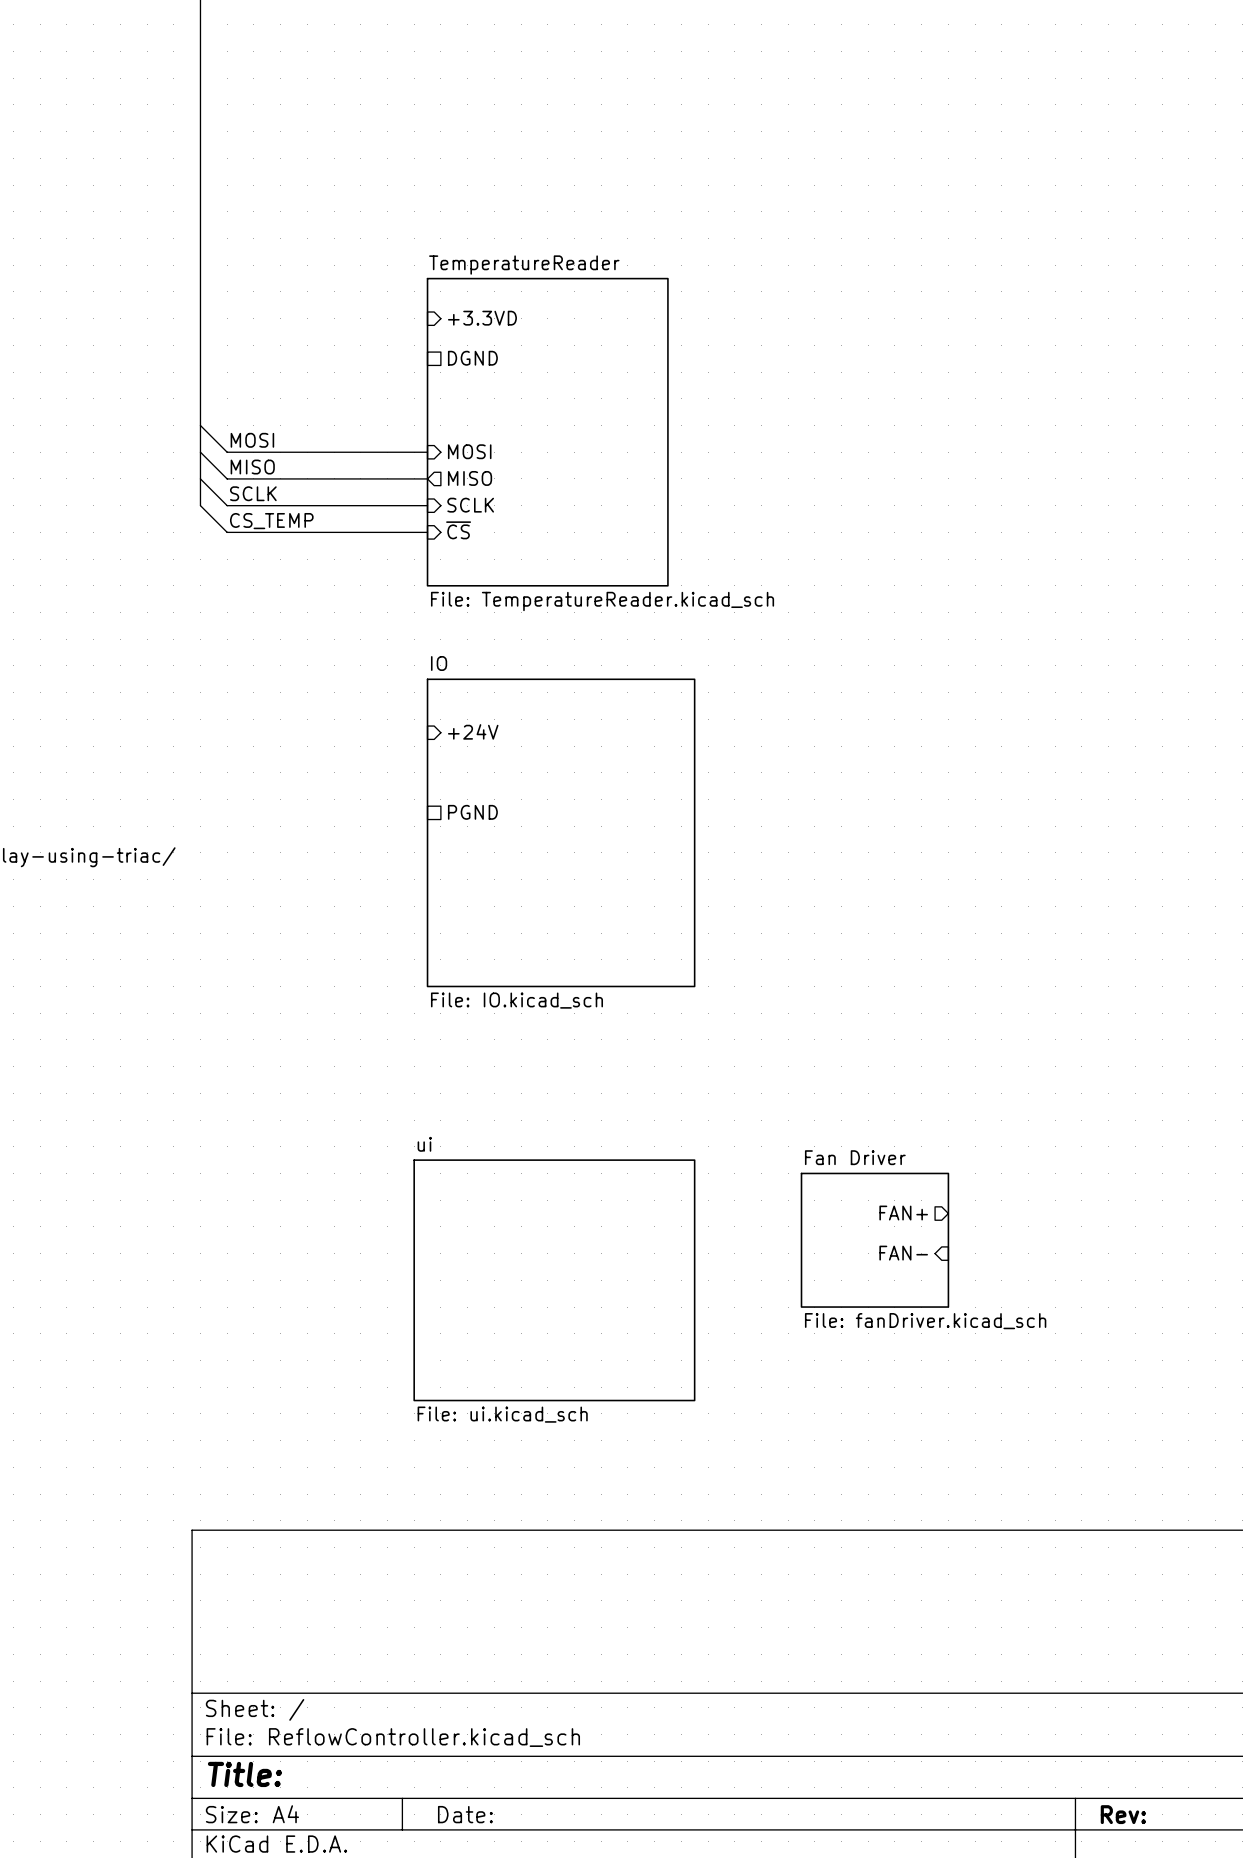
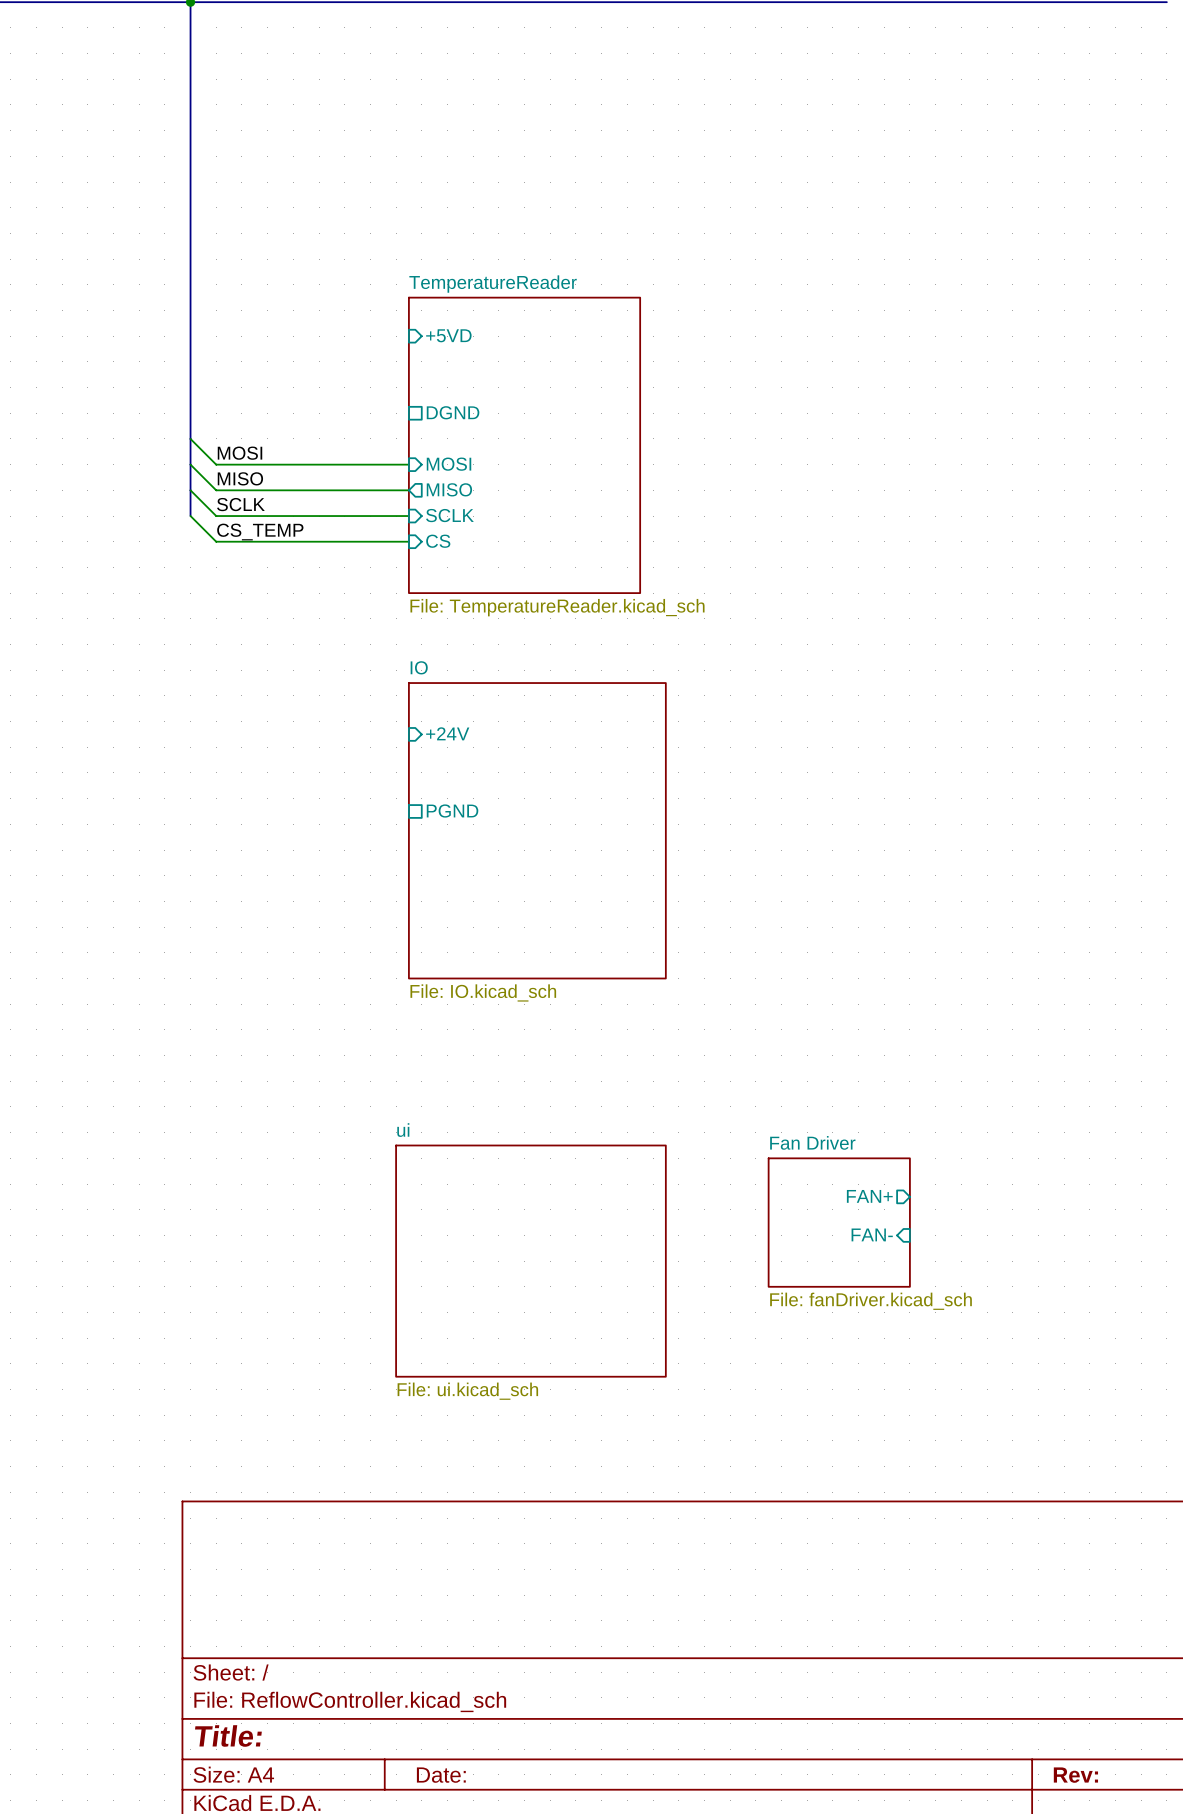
sheet pin: +3.3VD (482, 318) -> +5VD (448, 335)
sheet pin position: DGND (472, 358) -> DGND (453, 412)
sheet pin: ~{CS} (458, 530) -> CS (438, 541)

